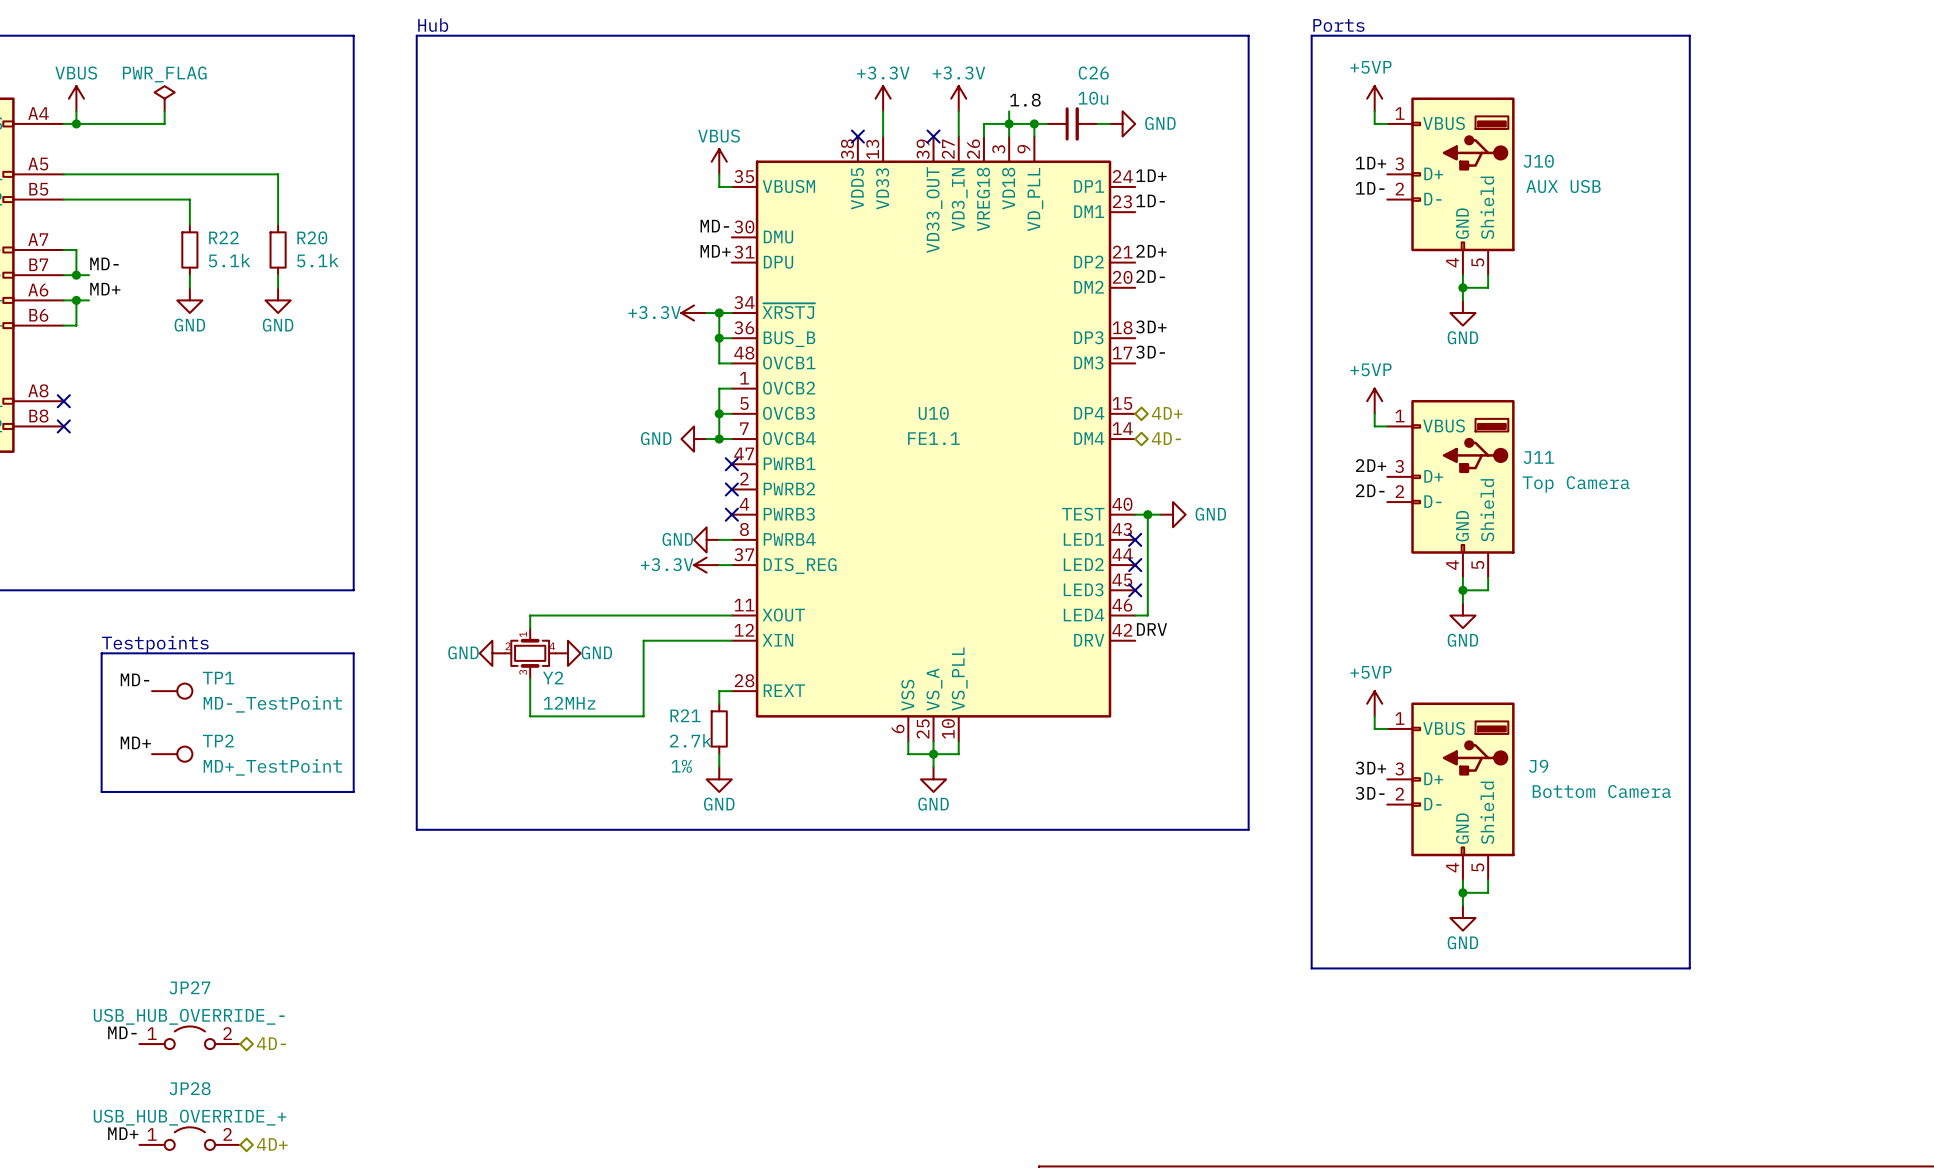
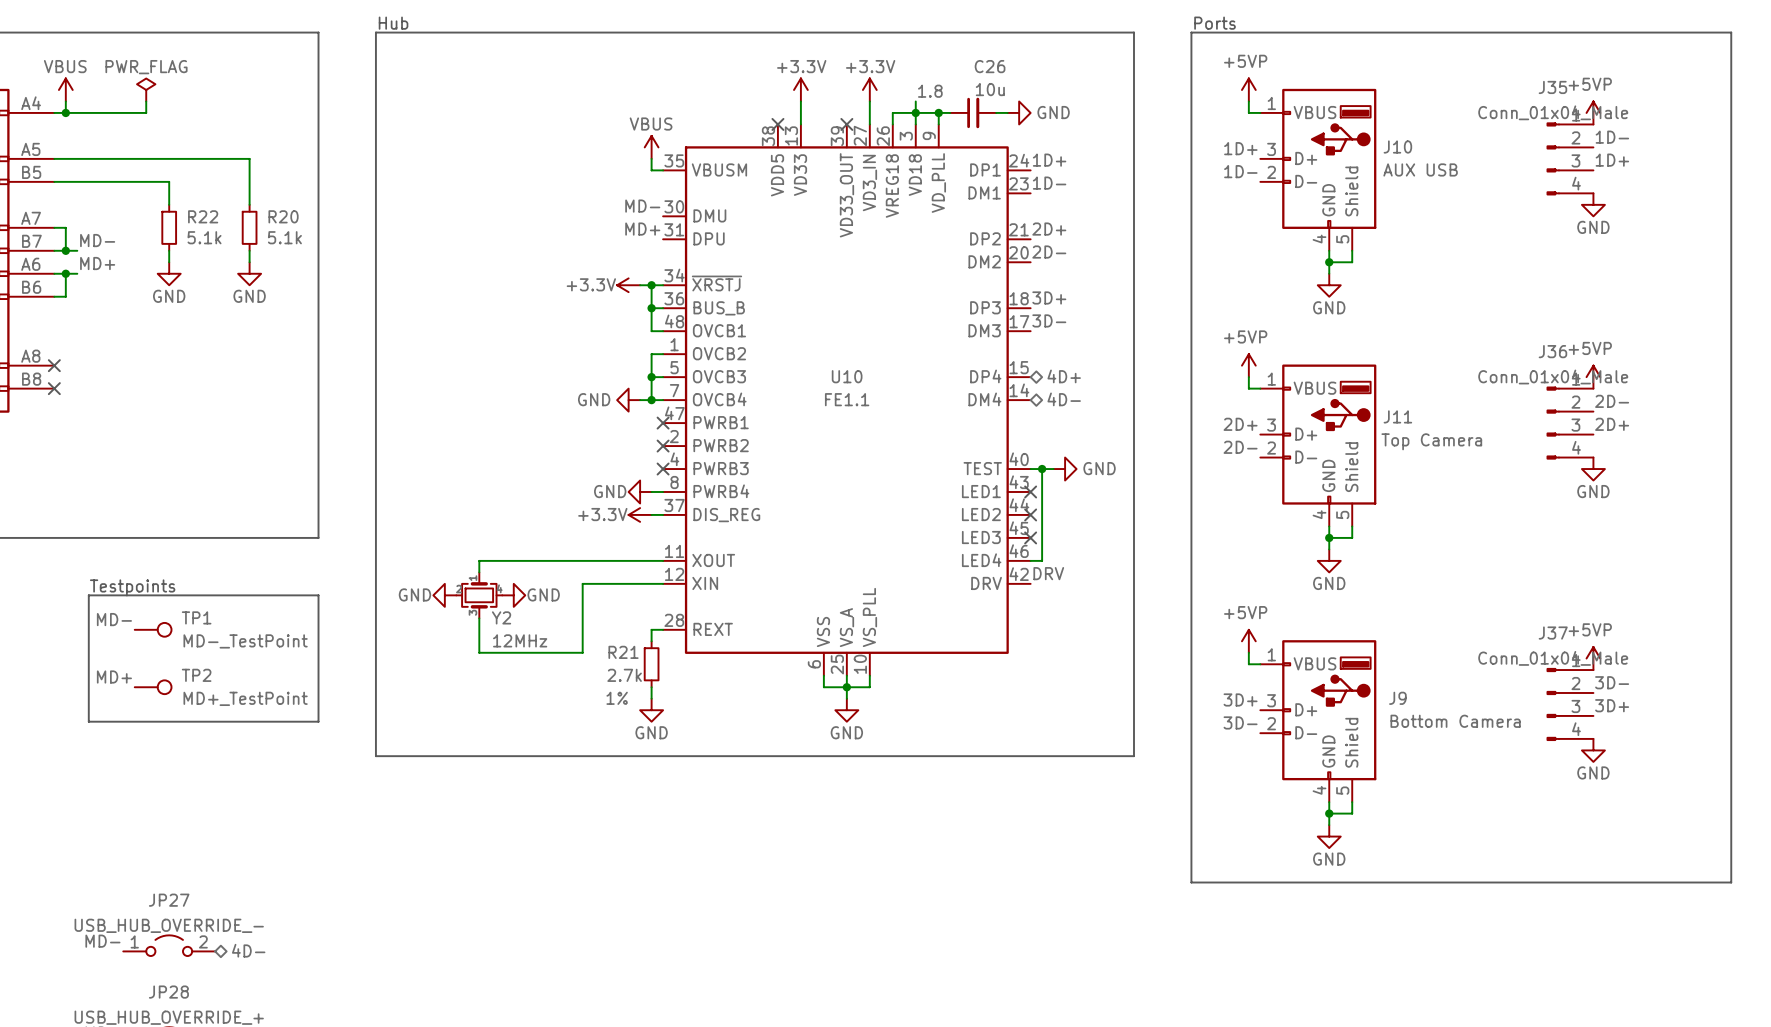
line: (1689, 35) (1689, 968) -> (1535, 32) (1731, 32) (1731, 882) (1535, 882)
power symbol: none -> +5VP (1593, 112)
label: none -> 1D- (1612, 137)
J35: none -> Conn_01x04_Male (1570, 158)
label: none -> 1D+ (1612, 160)
power symbol: none -> GND (1593, 204)
power symbol: none -> +5VP (1593, 377)
label: none -> 2D- (1612, 401)
J36: none -> Conn_01x04_Male (1570, 423)
label: none -> 2D+ (1612, 424)
power symbol: none -> GND (1593, 469)
power symbol: none -> +5VP (1593, 658)
label: none -> 3D- (1612, 682)
J37: none -> Conn_01x04_Male (1570, 704)
label: none -> 3D+ (1612, 705)
power symbol: none -> GND (1593, 750)

